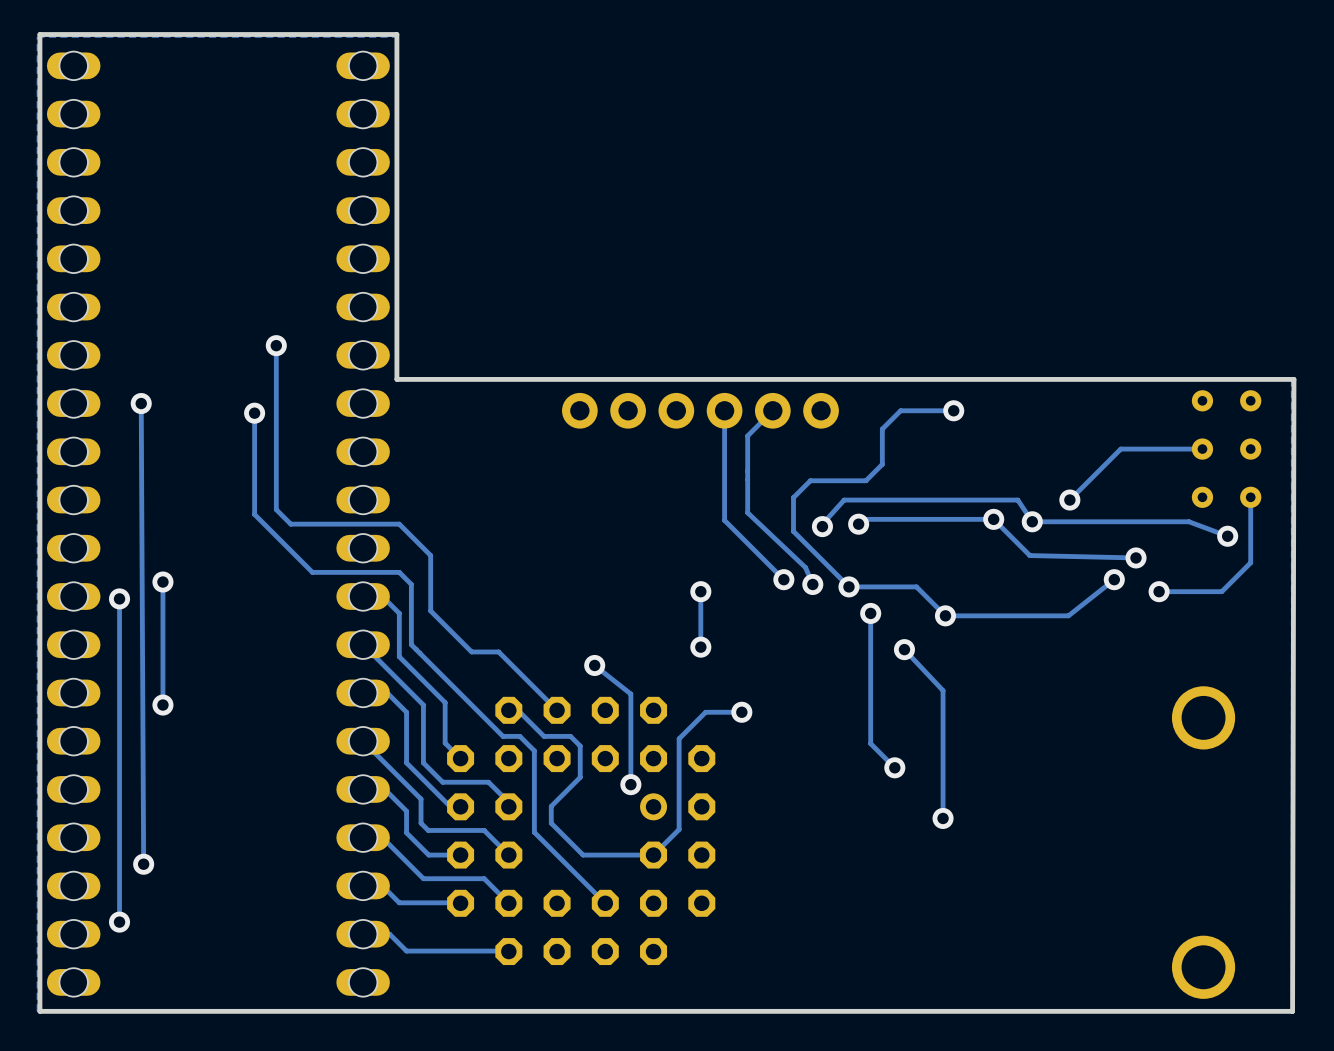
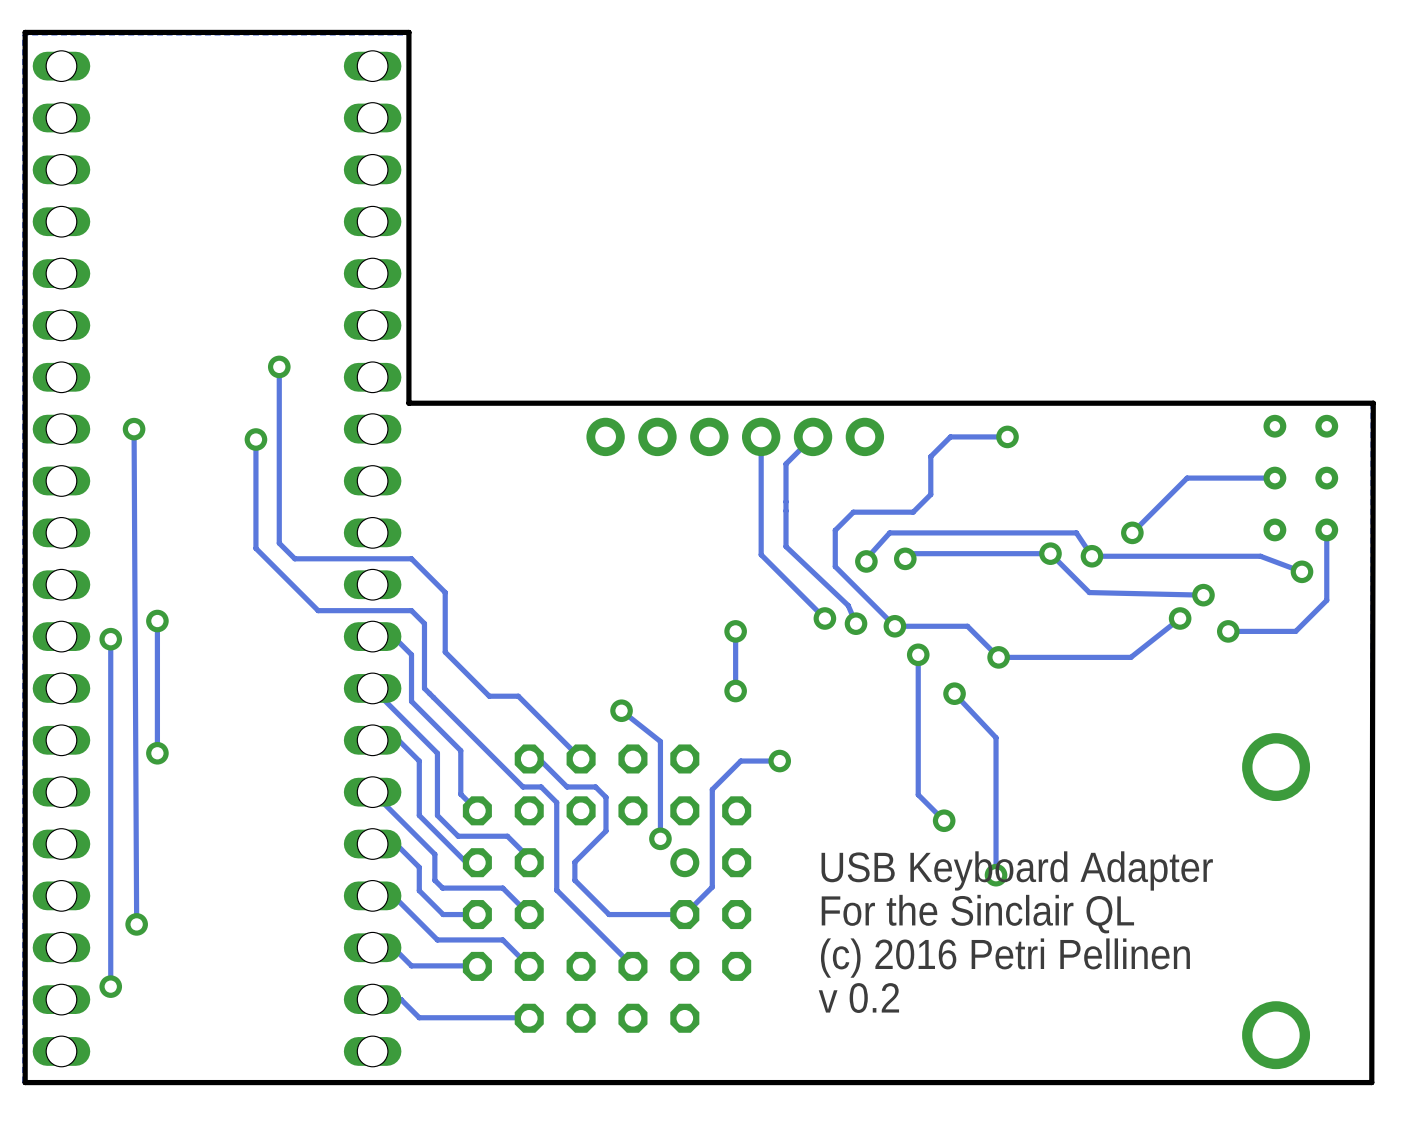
text: none -> USB Keyboard Adapter (1017, 870)
text: none -> For the Sinclair QL (977, 914)
text: none -> (c) 2016 Petri Pellinen (1005, 958)
text: none -> v 0.2 (858, 998)

